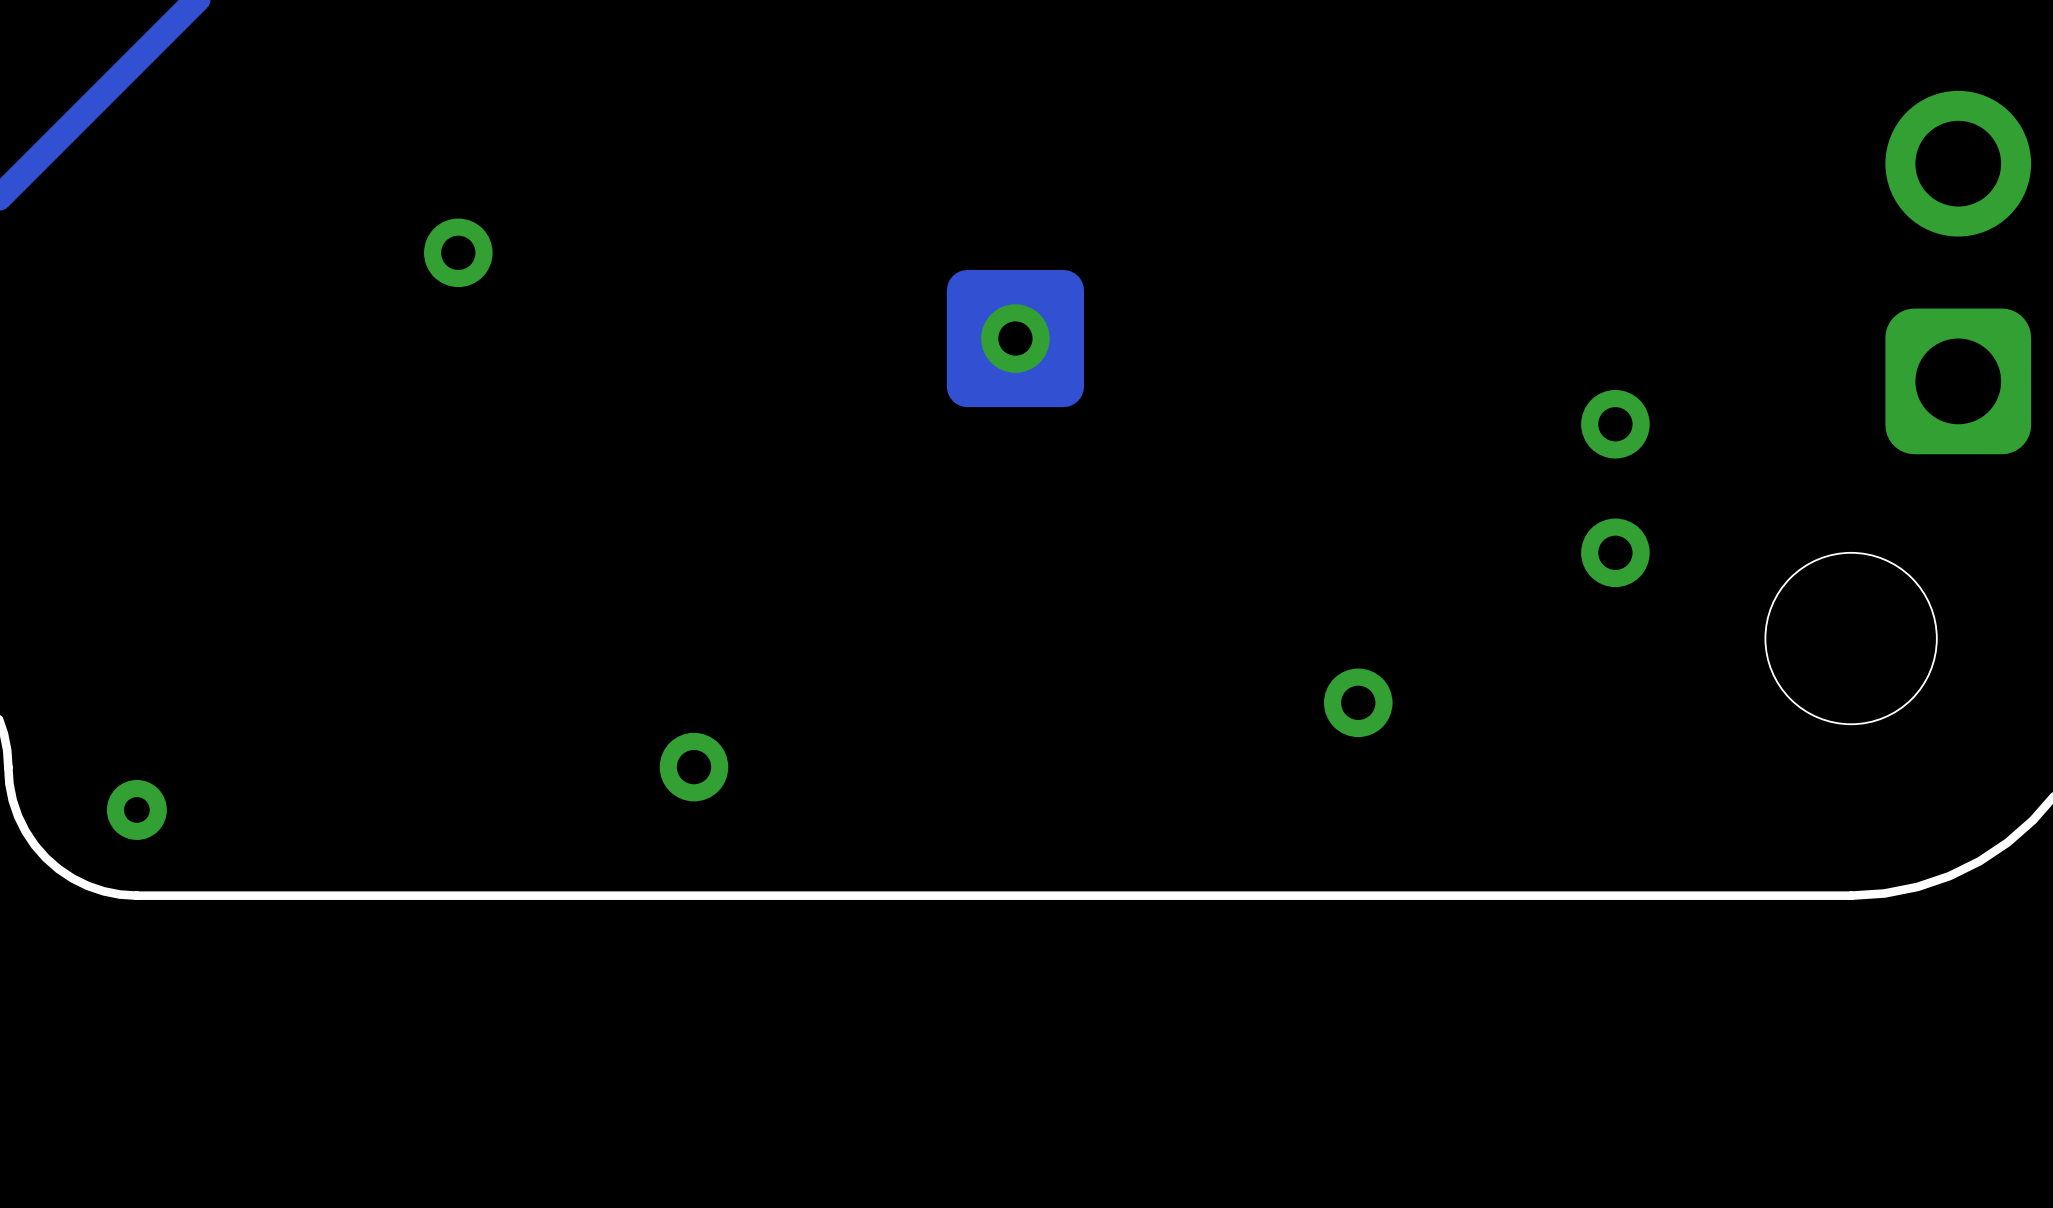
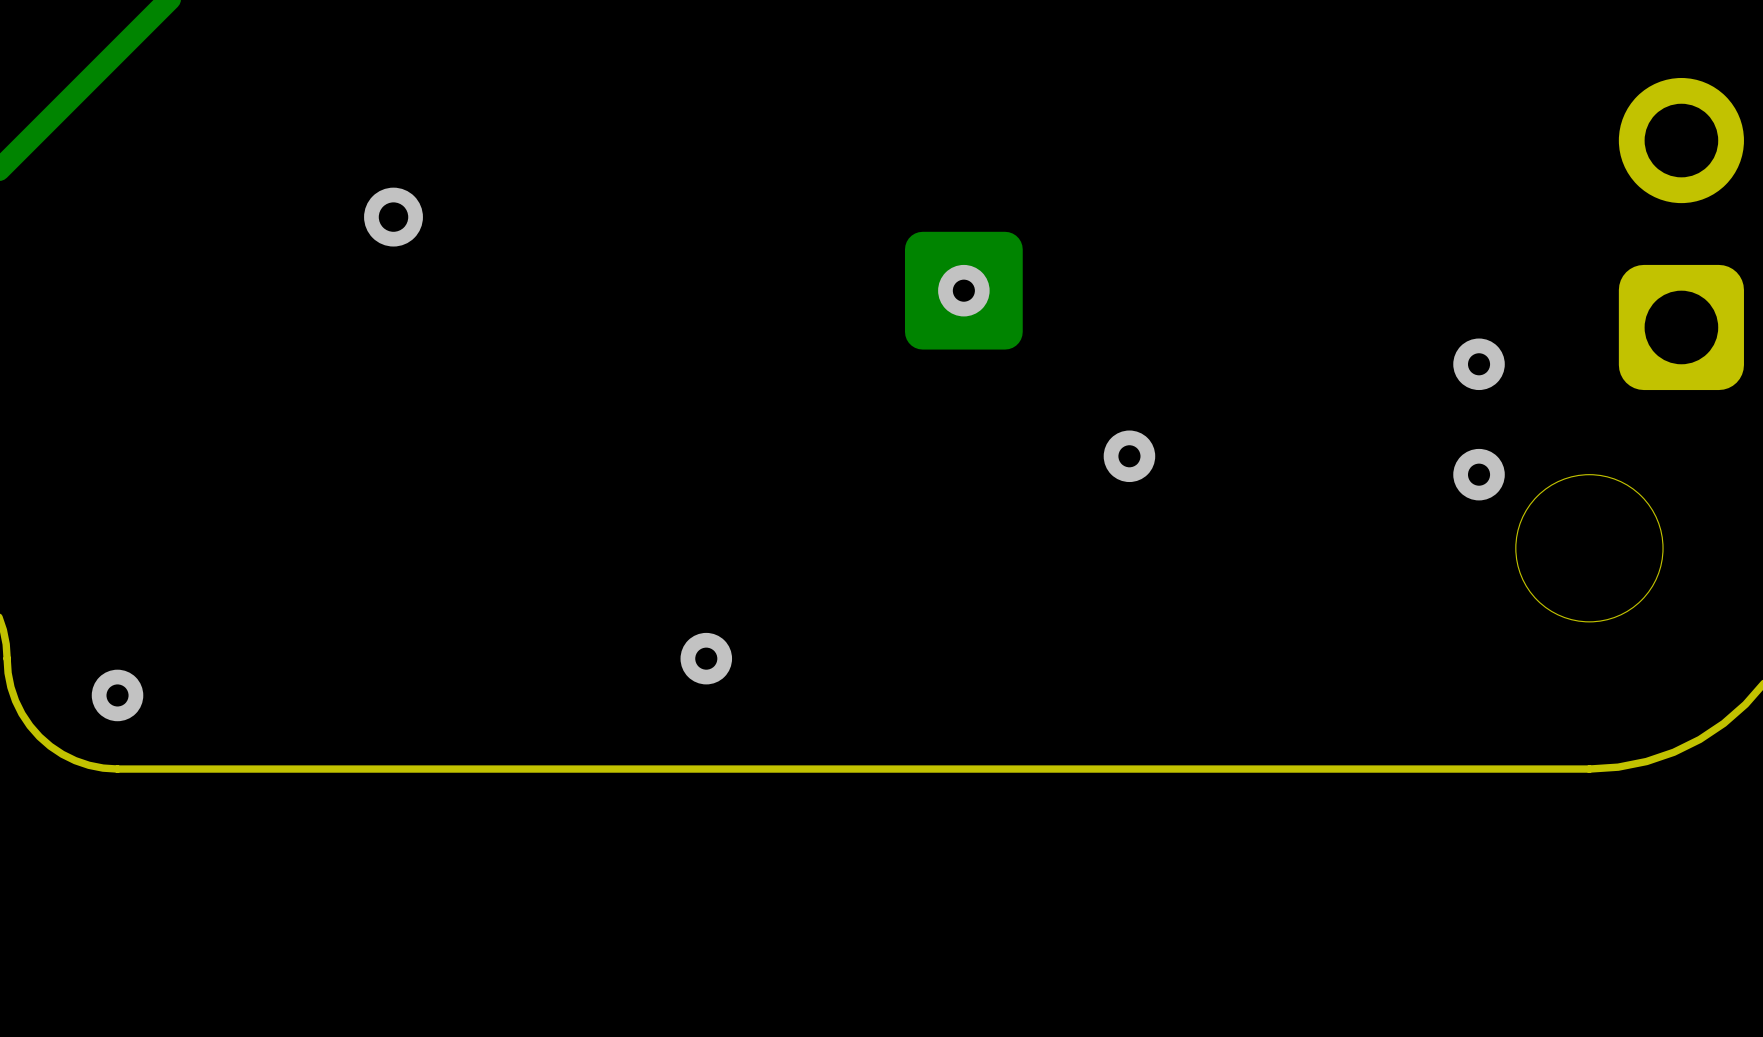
part position: (1015, 338) -> (963, 290)
via: (1015, 338) -> none
via: none -> (963, 290)
via: (1615, 424) -> none
via: none -> (1479, 364)
via: none -> (1129, 456)
via: (1615, 552) -> none
via: none -> (1479, 474)
via: (1358, 702) -> none
via: (694, 767) -> none
via: none -> (706, 658)

